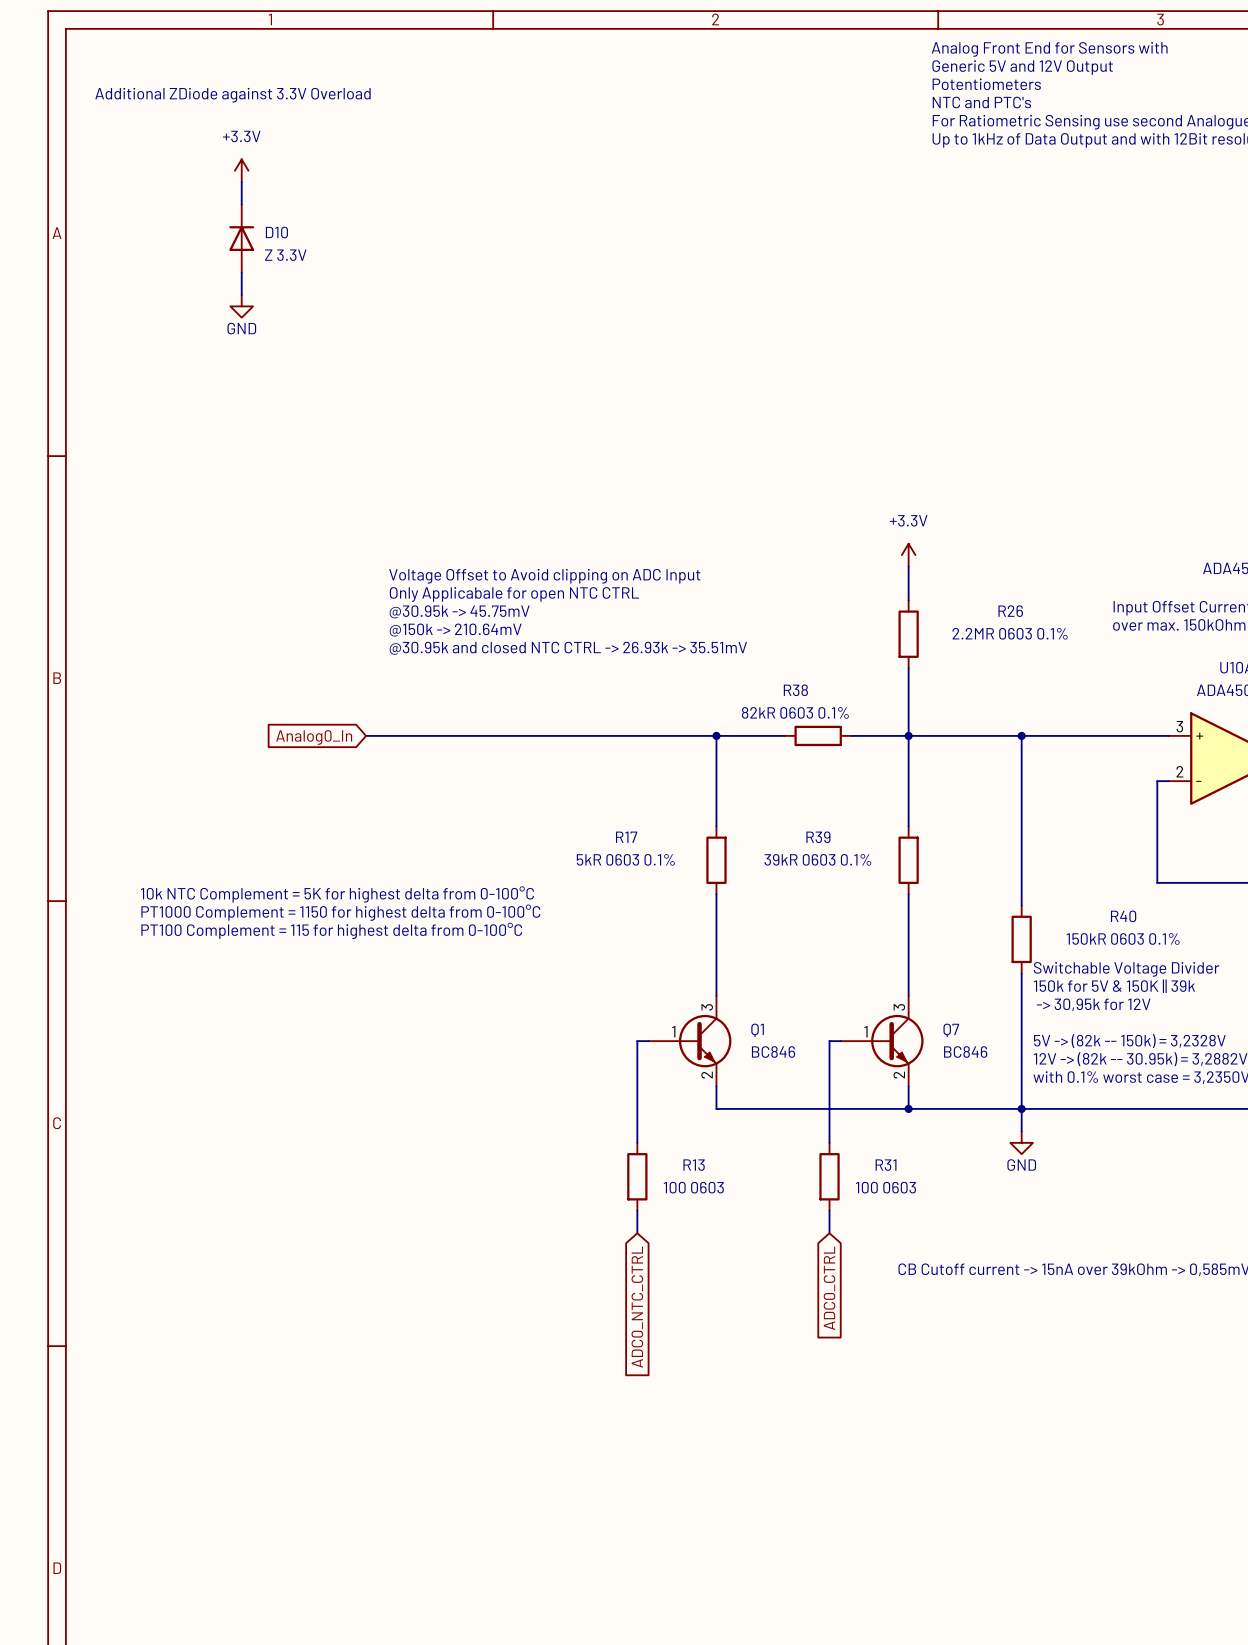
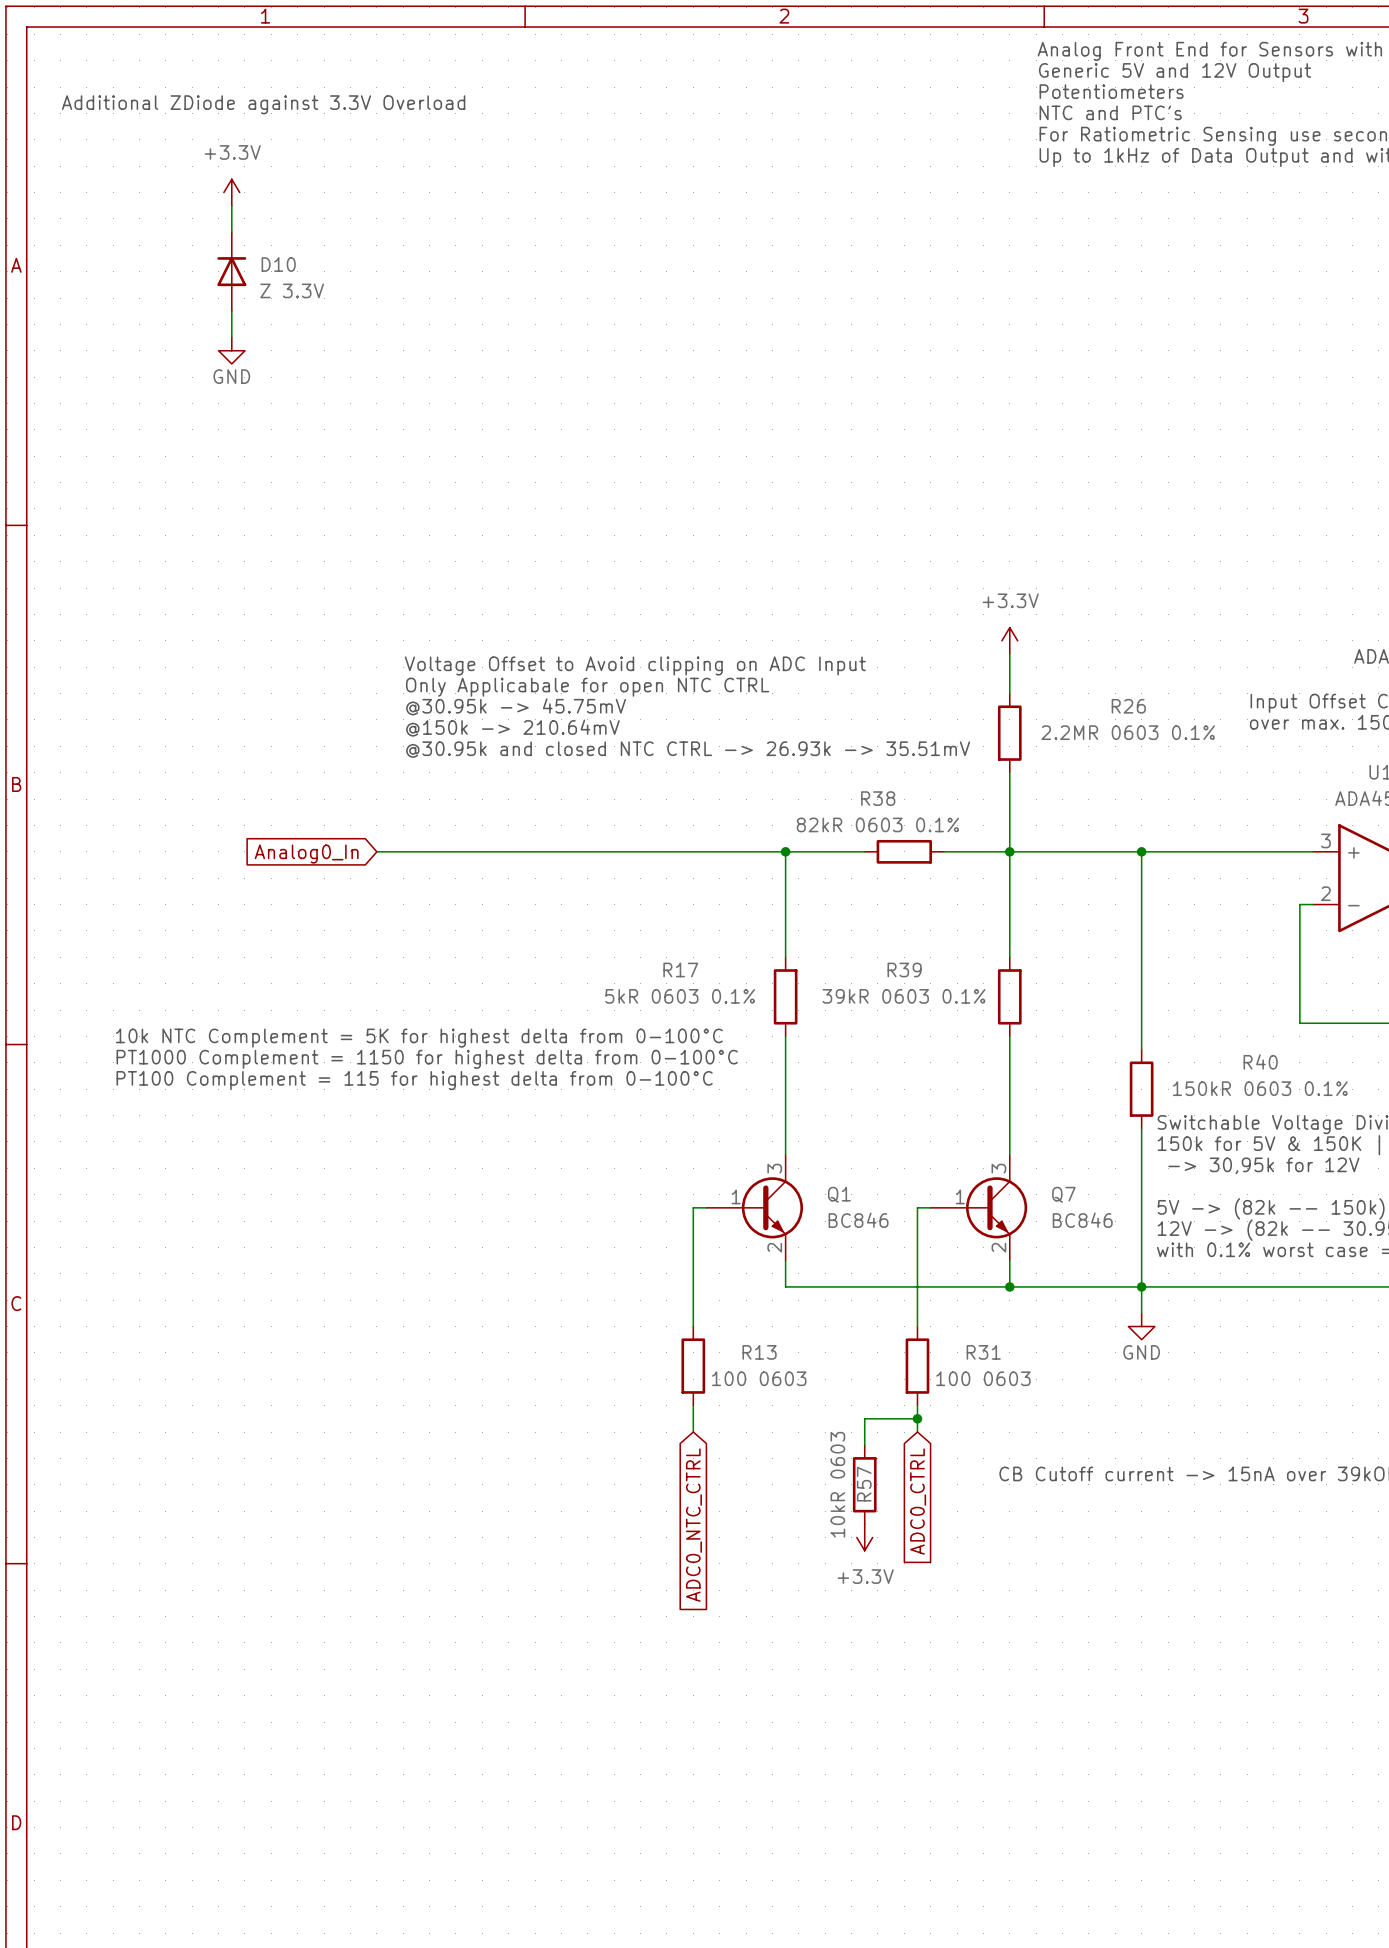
wire: none -> (917, 1418) (864, 1418) (864, 1445)
junction: none -> (917, 1418)
R57: none -> 10kR 0603 (864, 1484)
power symbol: none -> +3.3V (864, 1537)

